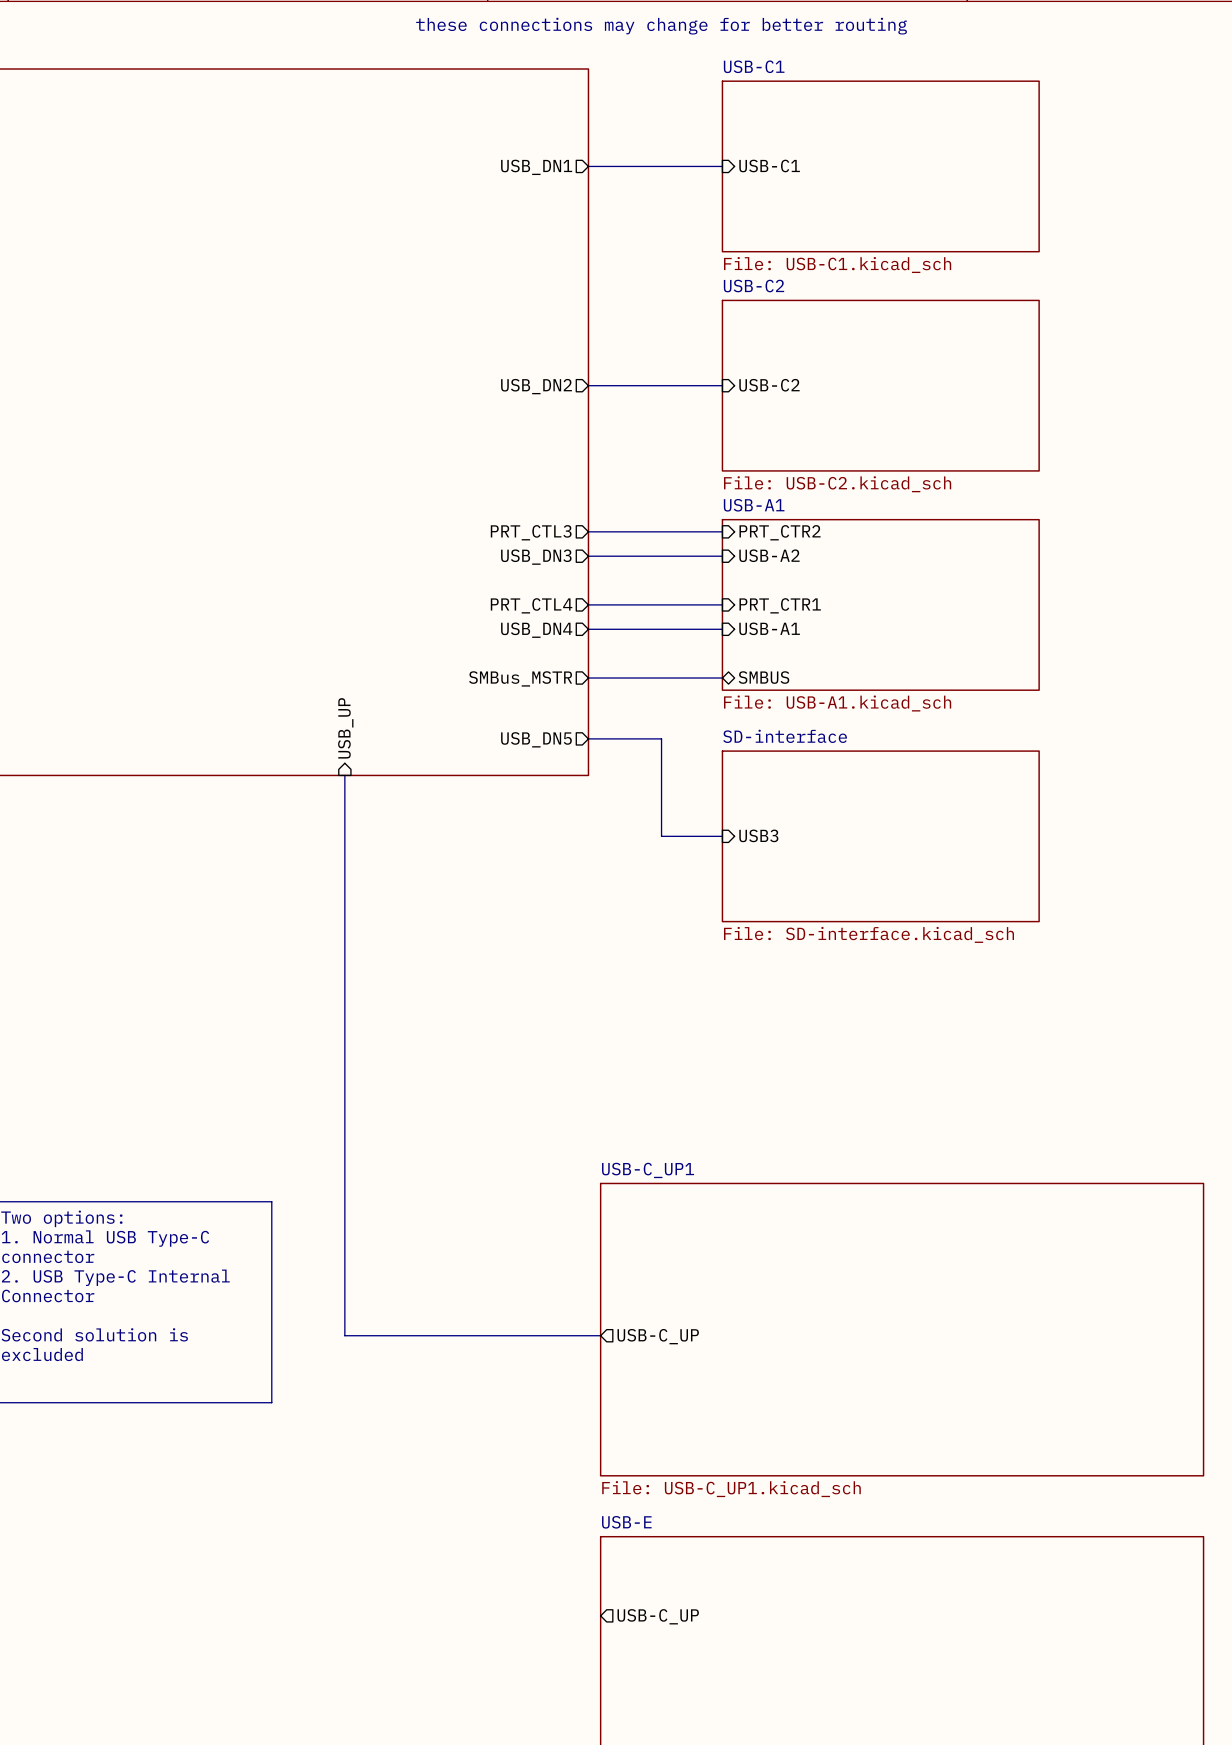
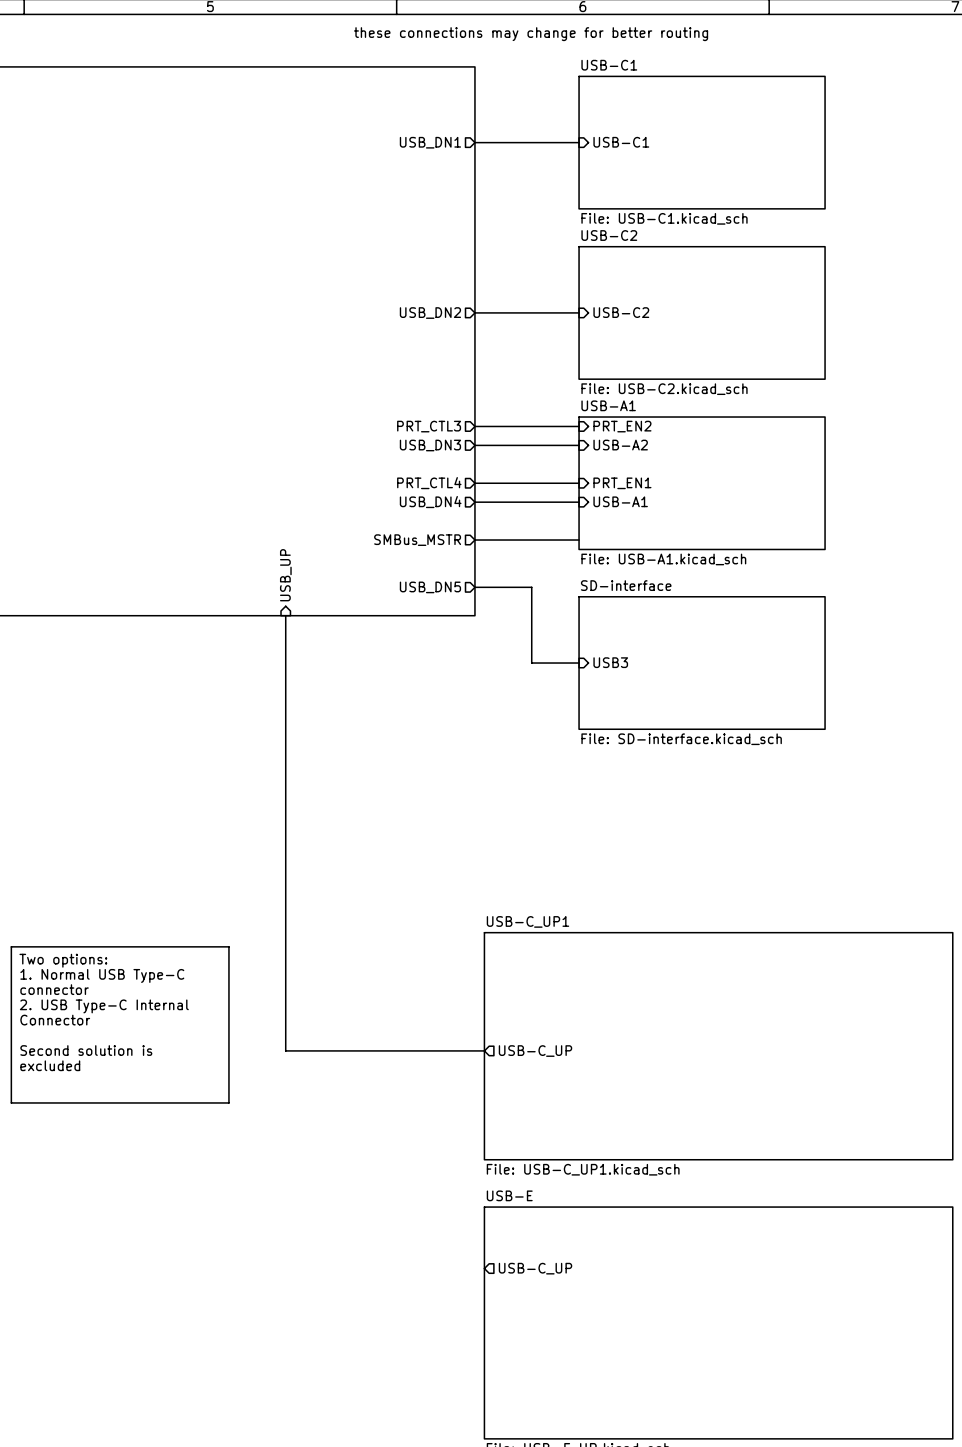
sheet pin: PRT_CTR2 (780, 532) -> PRT_EN2 (622, 426)
sheet pin: PRT_CTR1 (780, 605) -> PRT_EN1 (622, 483)
sheet pin: SMBUS (763, 677) -> none

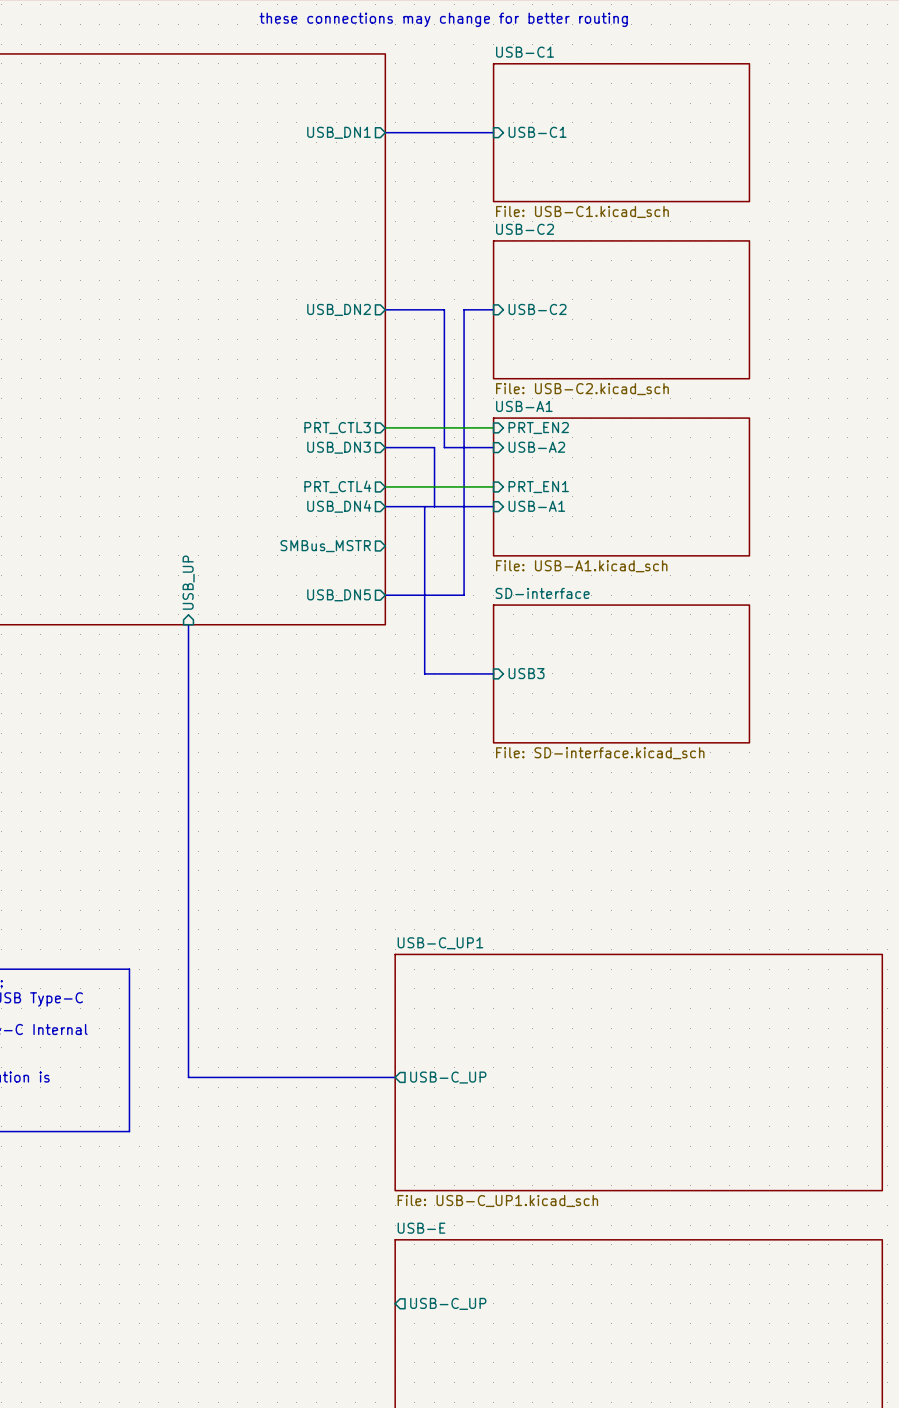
bus: (531, 312) (550, 312) -> (444, 309) (444, 447)
bus: none -> (464, 309) (464, 595) (444, 595)
bus: (522, 445) (531, 445) -> (434, 447) (434, 506)
bus: (474, 540) (579, 540) -> none
bus: (531, 587) (531, 663) -> (424, 506) (424, 673) (444, 673)

